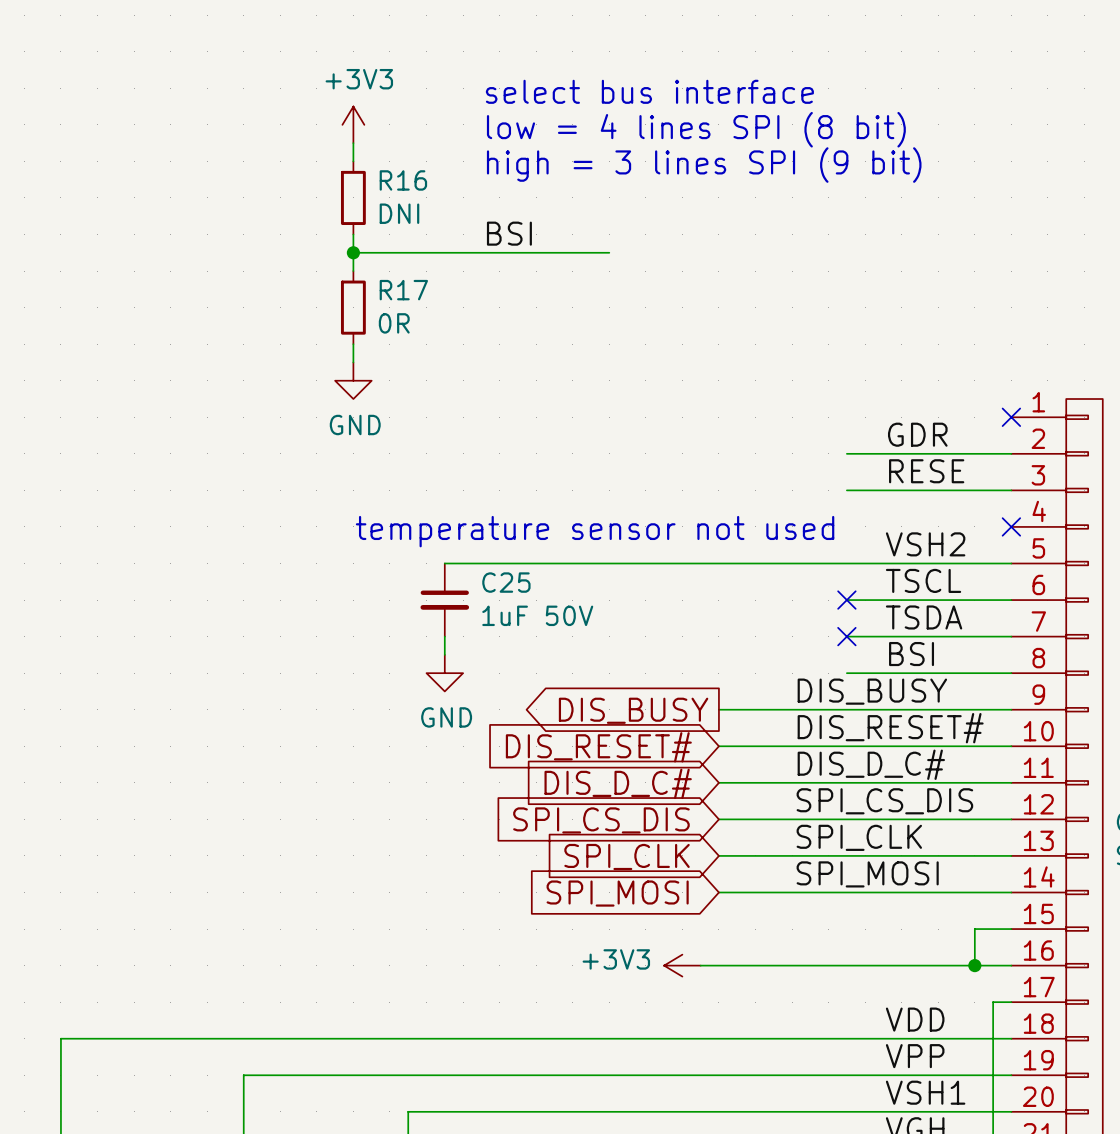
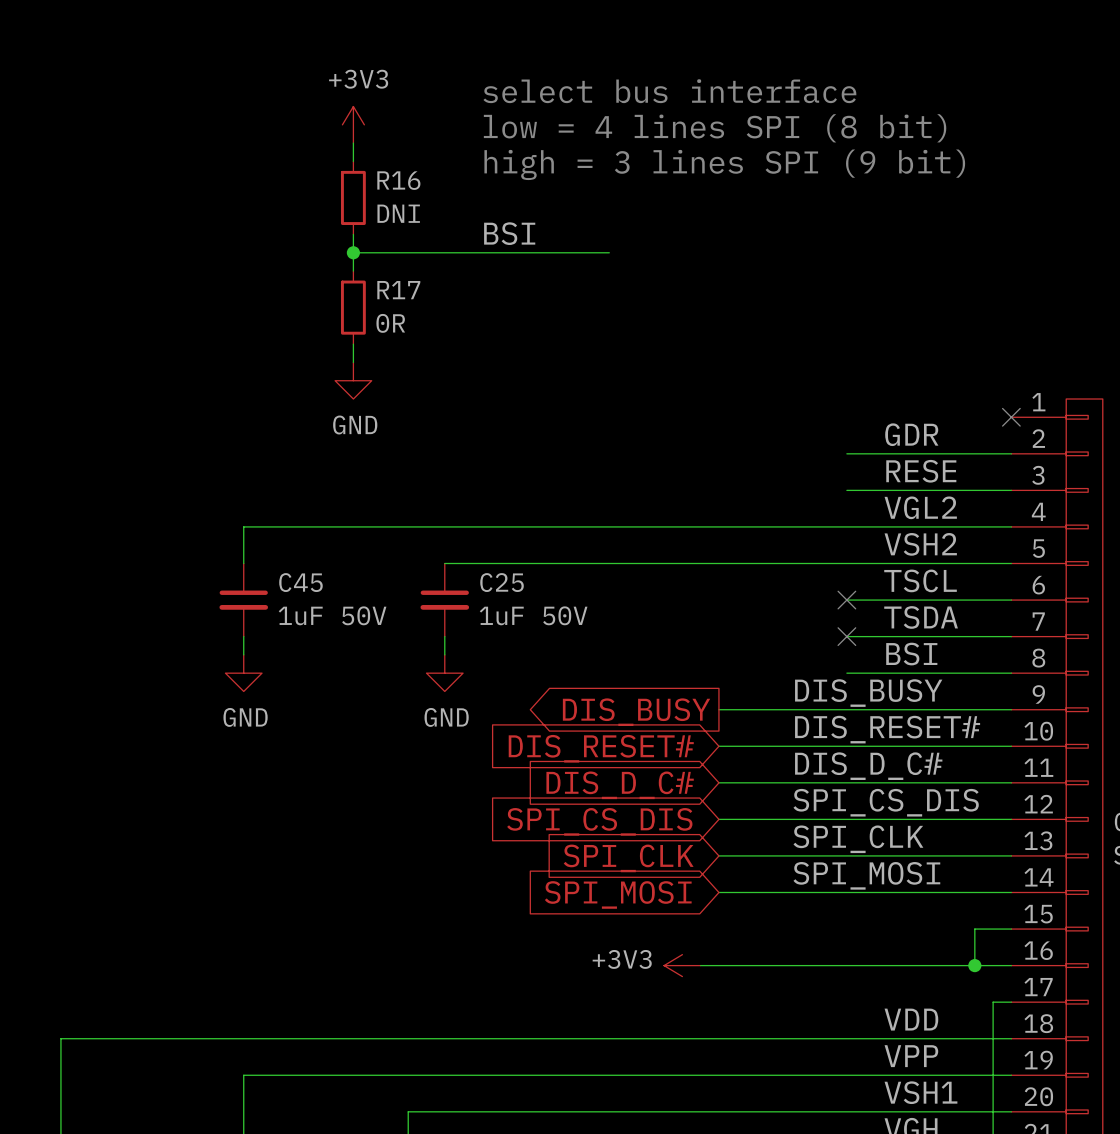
label: none -> VGL2 (920, 507)
wire: none -> (1011, 526) (243, 526) (243, 563)
no-connect mark: (1011, 526) -> none
text: temperature sensor not used (595, 531) -> none
C45: none -> 1uF 50V (243, 600)
wire: none -> (243, 636) (243, 654)
power symbol: none -> GND (243, 673)

